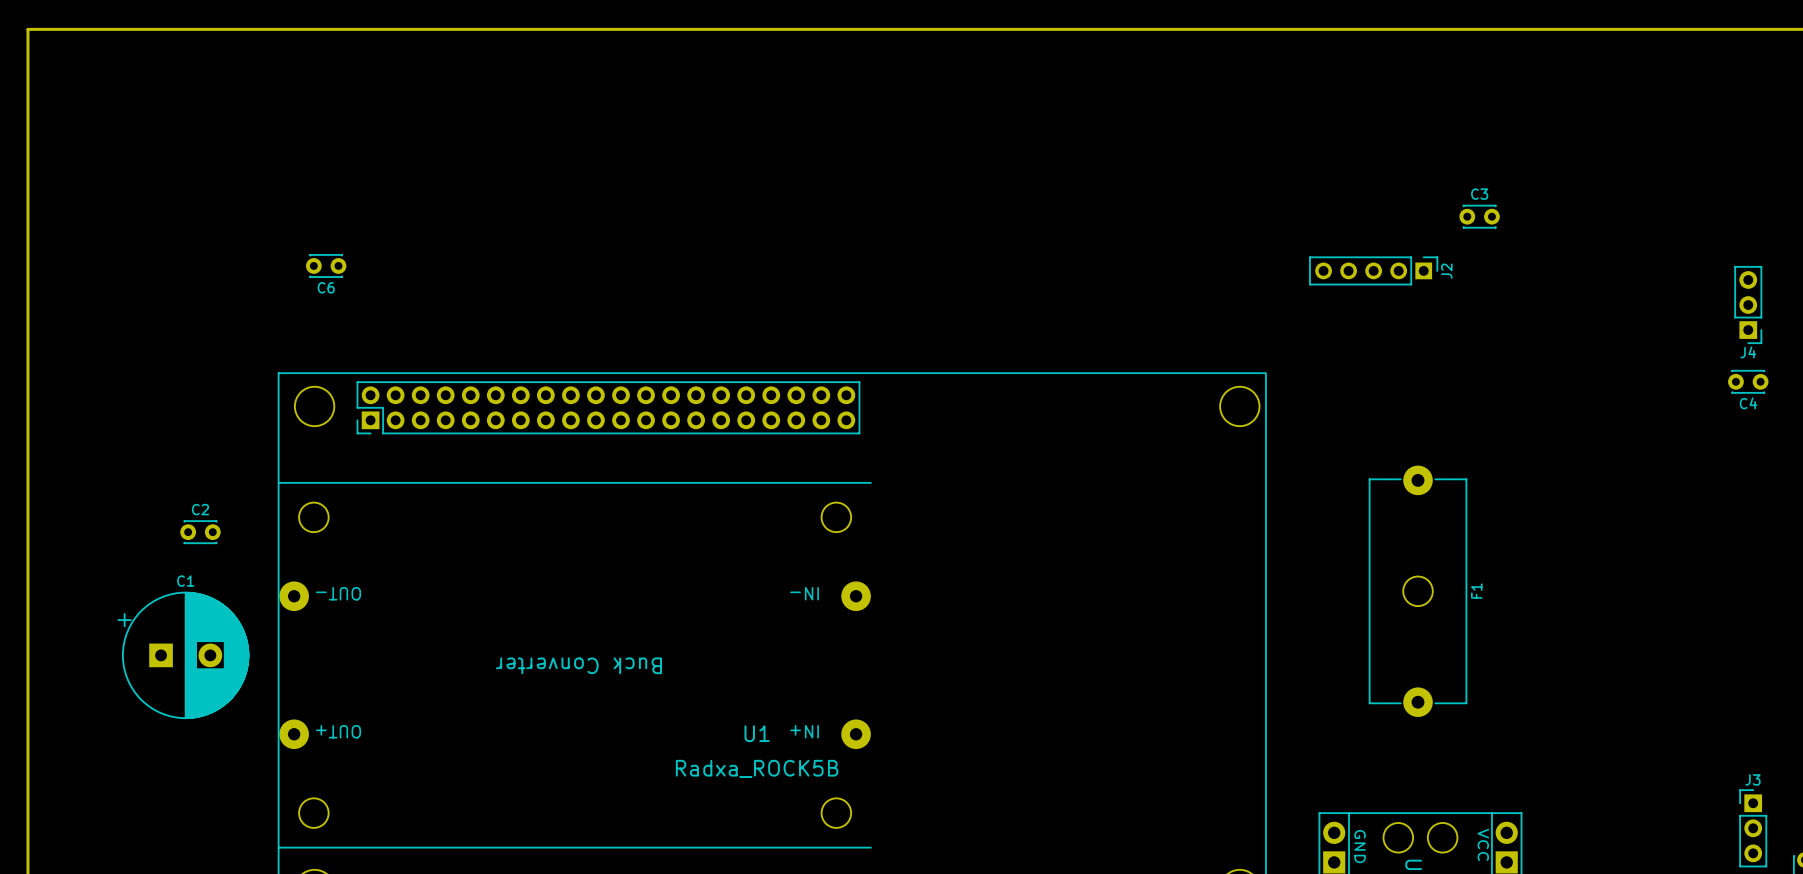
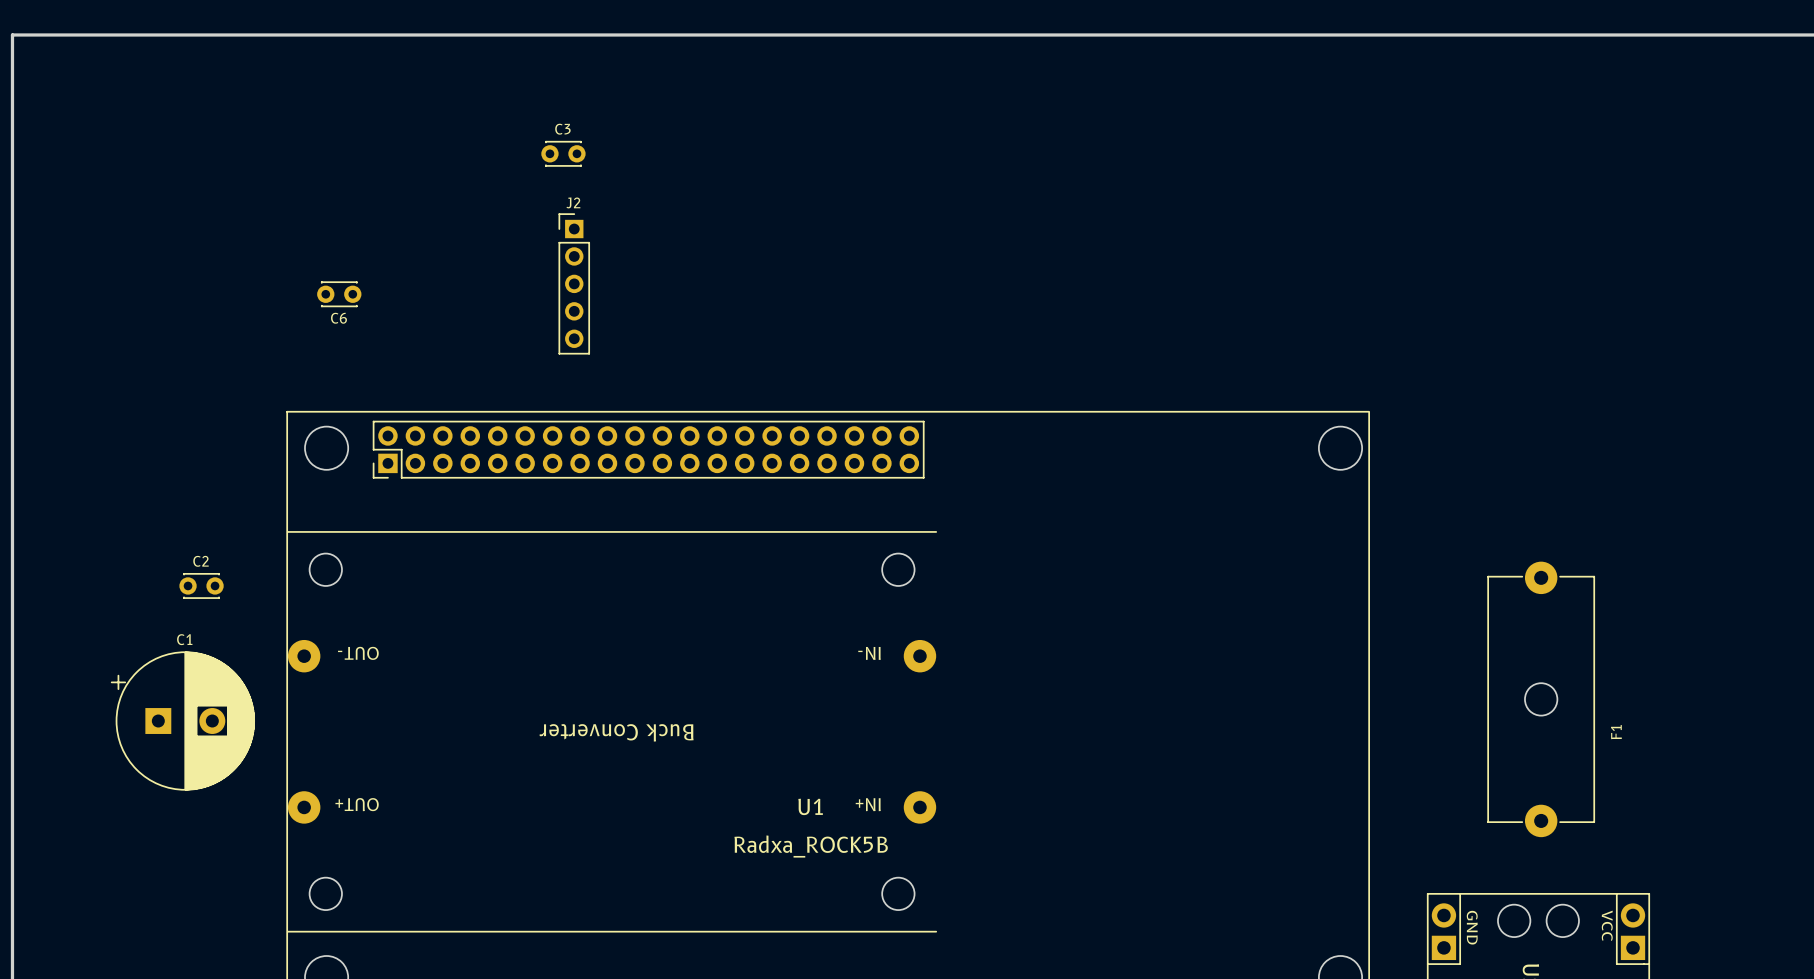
C3 position: (1479, 216) -> (563, 153)
J2 rotation: 0° (1373, 270) -> 90° counterclockwise (574, 283)
J2 position: (1373, 270) -> (574, 283)
F1 position: (1418, 591) -> (1541, 699)
F1 name position: F1 (1476, 591) -> F1 (1616, 732)

